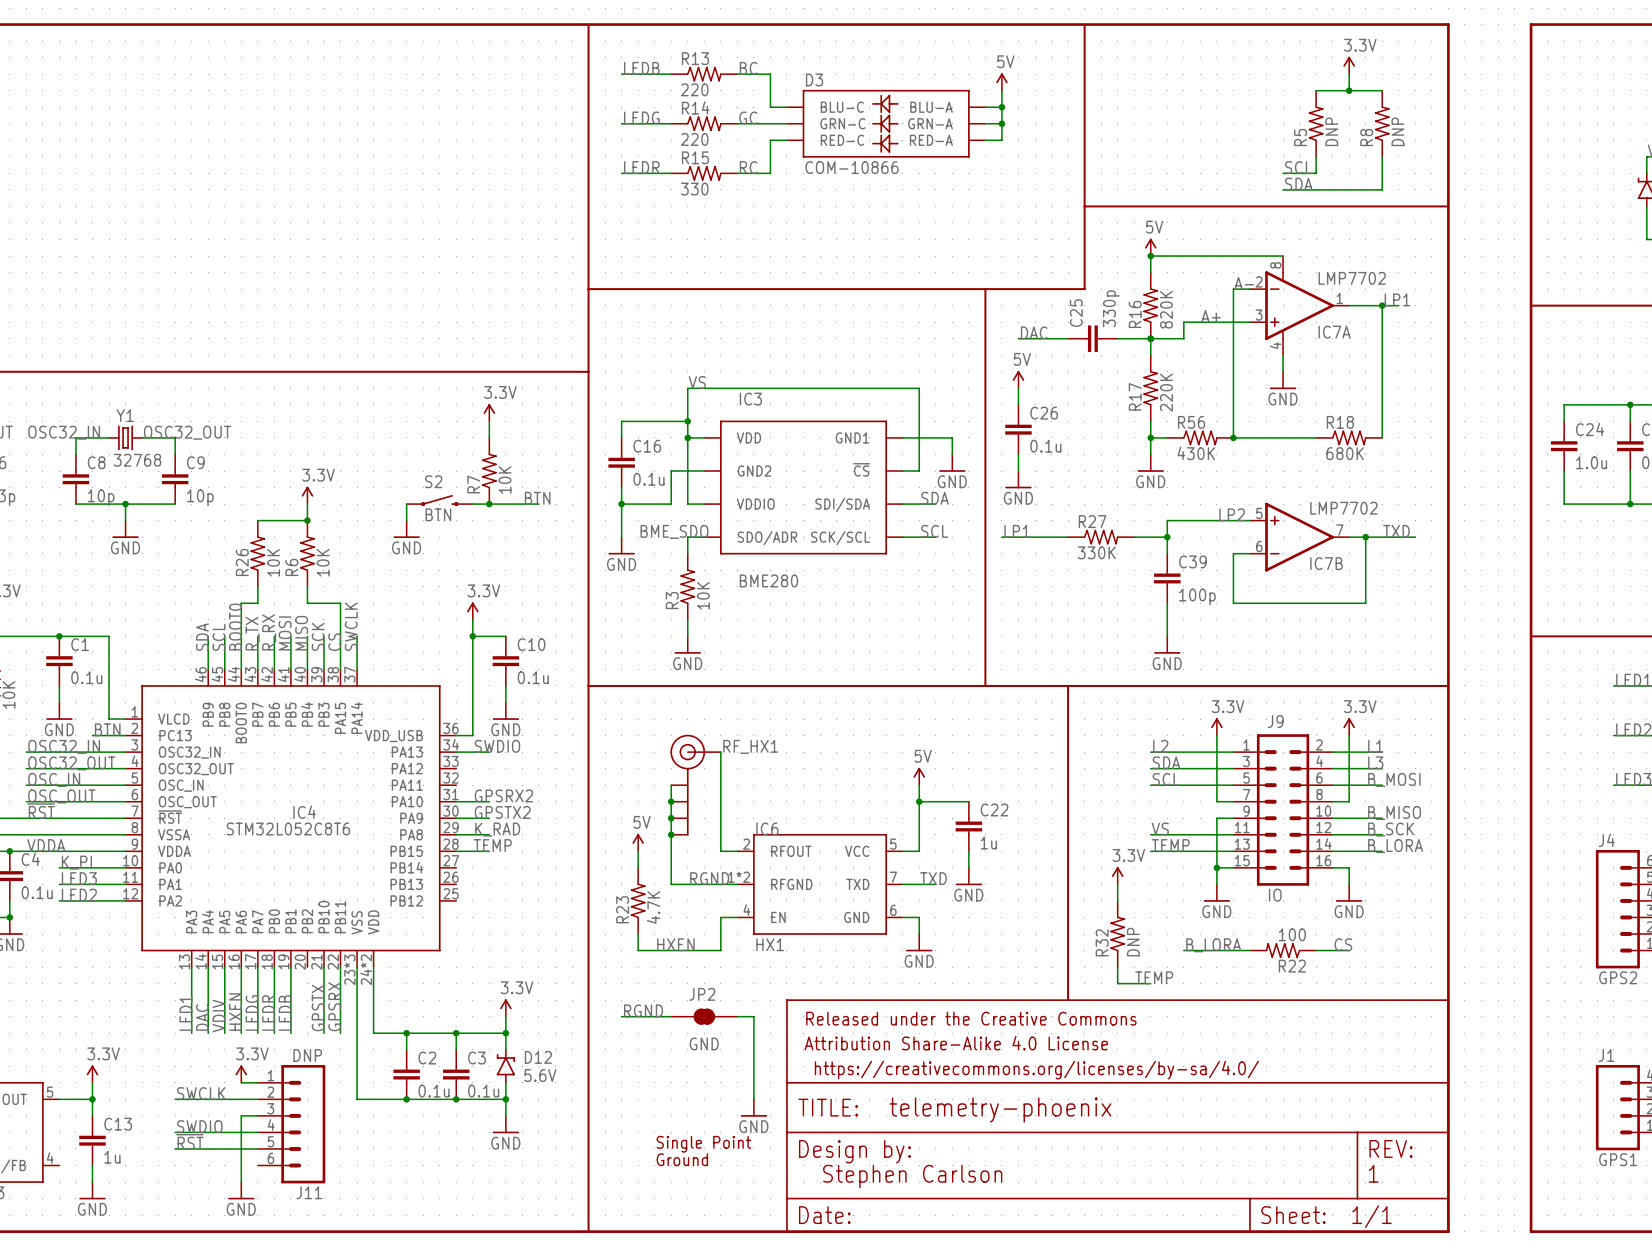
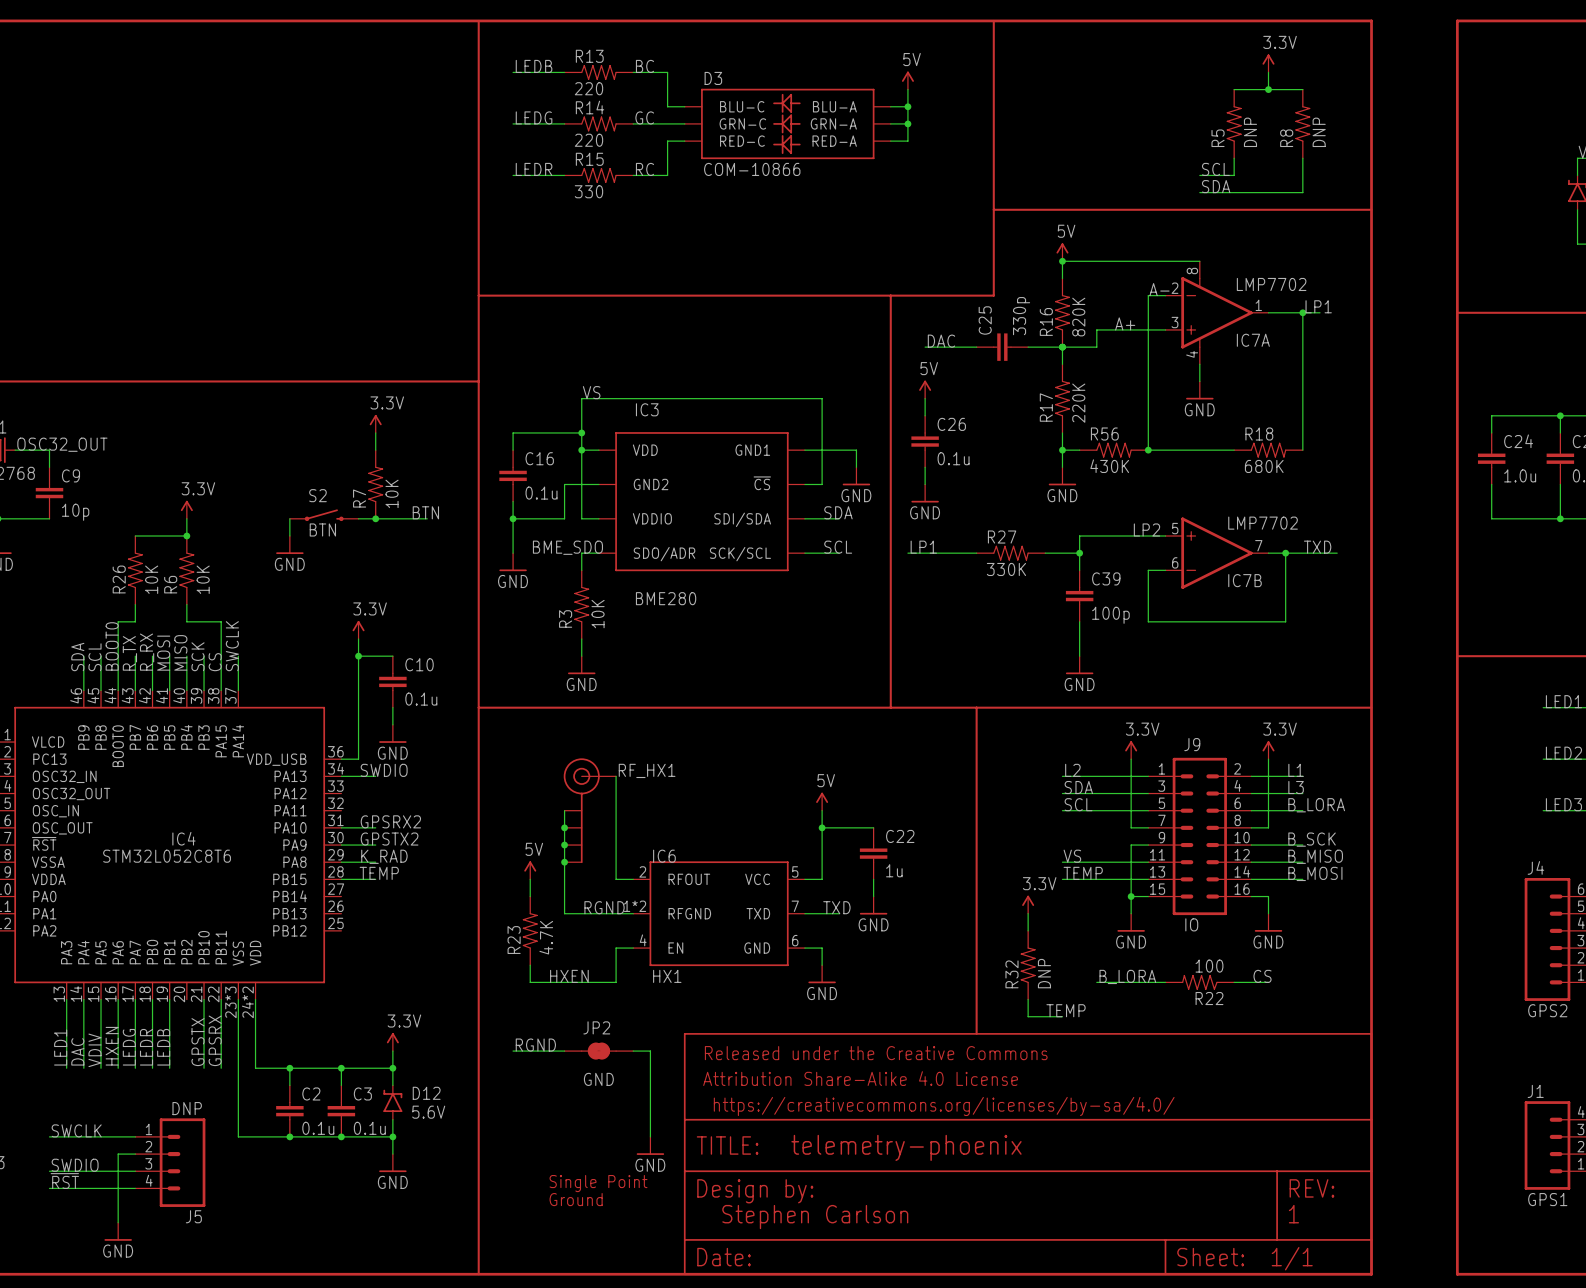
label: B_MOSI (1394, 779) -> B_LORA (1316, 805)
label: B_MISO (1394, 813) -> B_SCK (1312, 839)
label: B_SCK (1391, 829) -> B_MISO (1315, 856)
label: B_LORA (1395, 846) -> B_MOSI (1315, 873)
power symbol: 3.3V (241, 1074) -> none
wire: (241, 1082) (257, 1082) -> none
J11: DNP (291, 1124) -> none
J5: none -> DNP (170, 1162)

